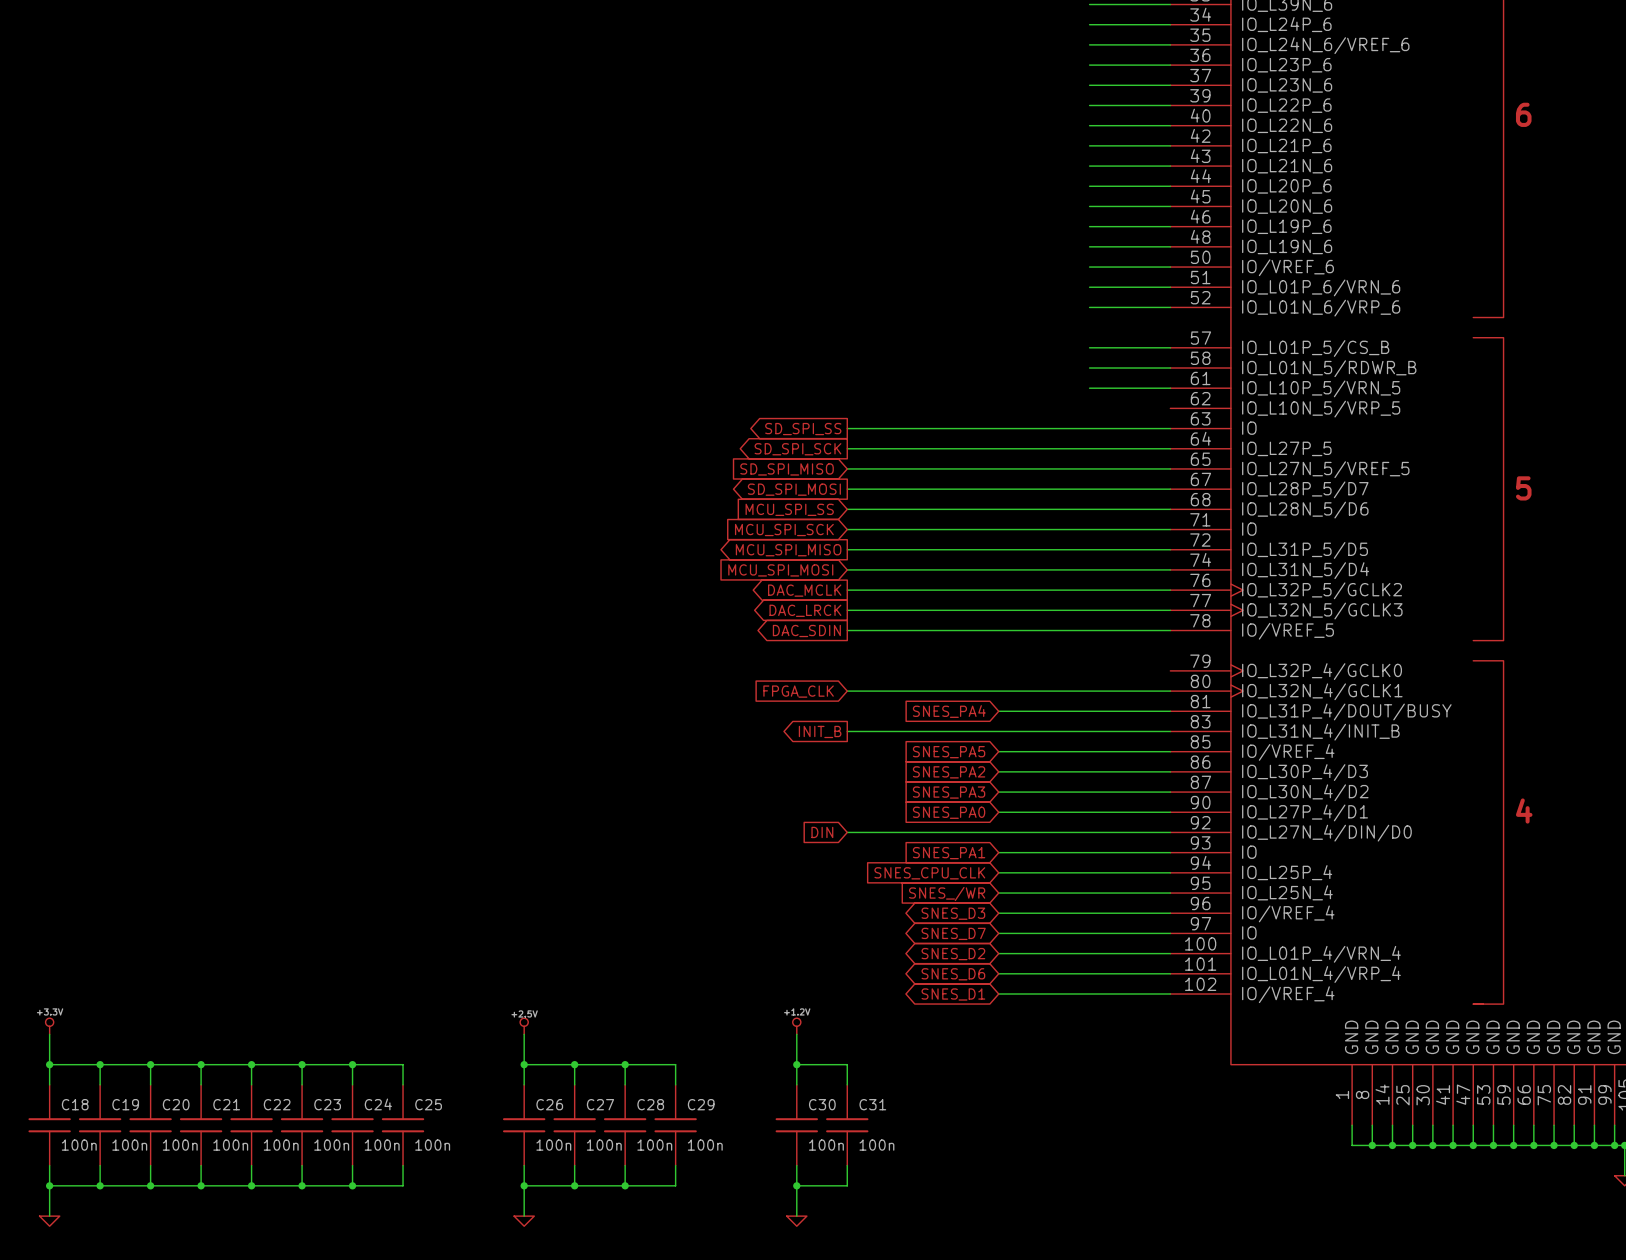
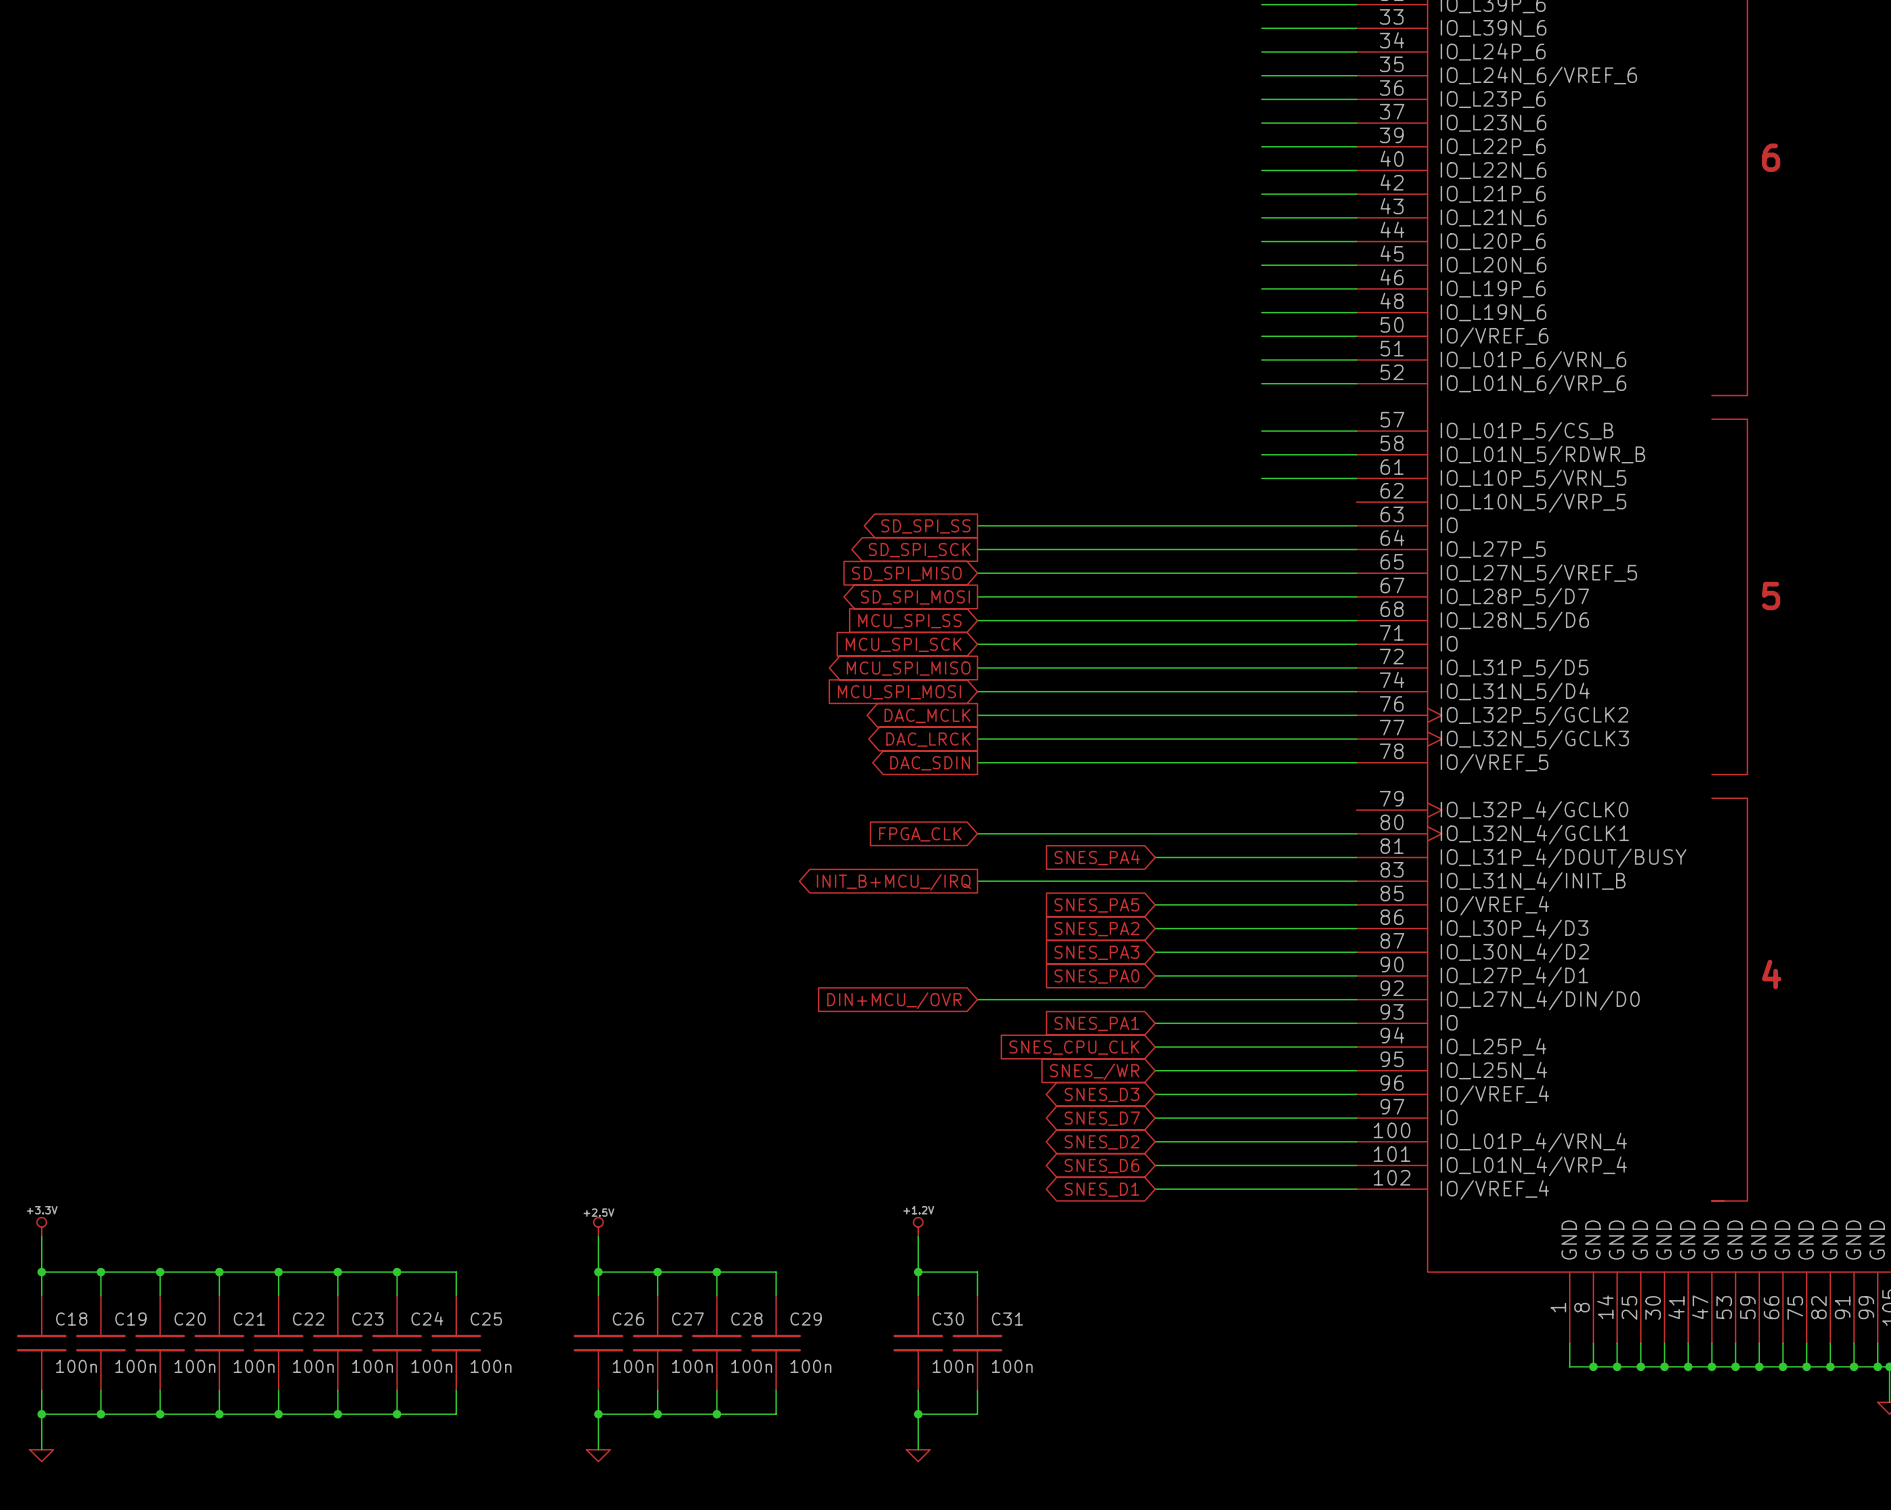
global label: INIT_B (820, 731) -> INIT_B+MCU_/IRQ (893, 882)
global label: DIN (822, 832) -> DIN+MCU_/OVR (894, 1000)

